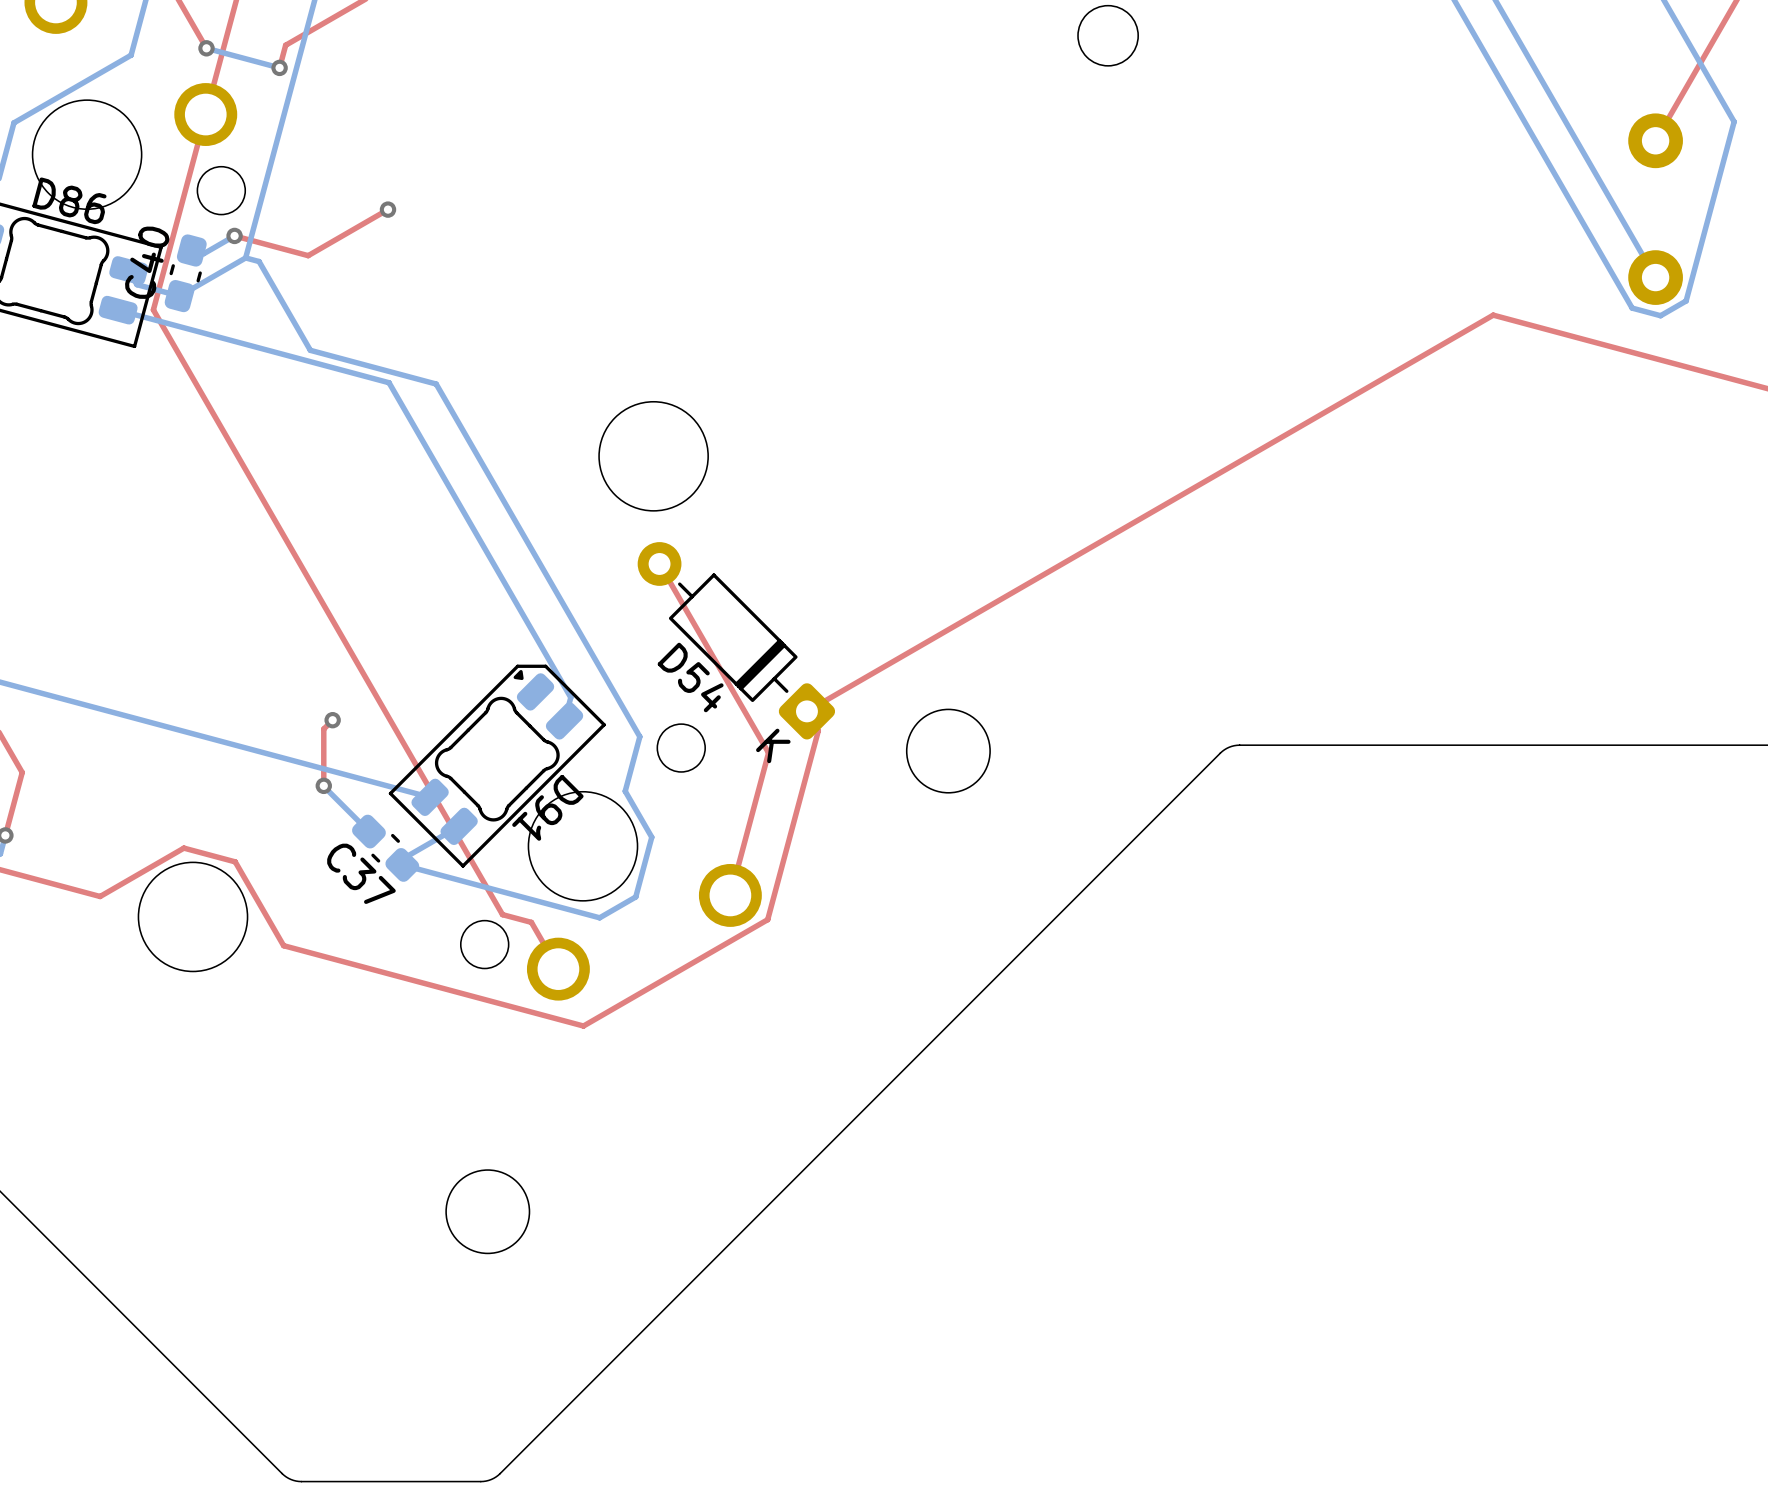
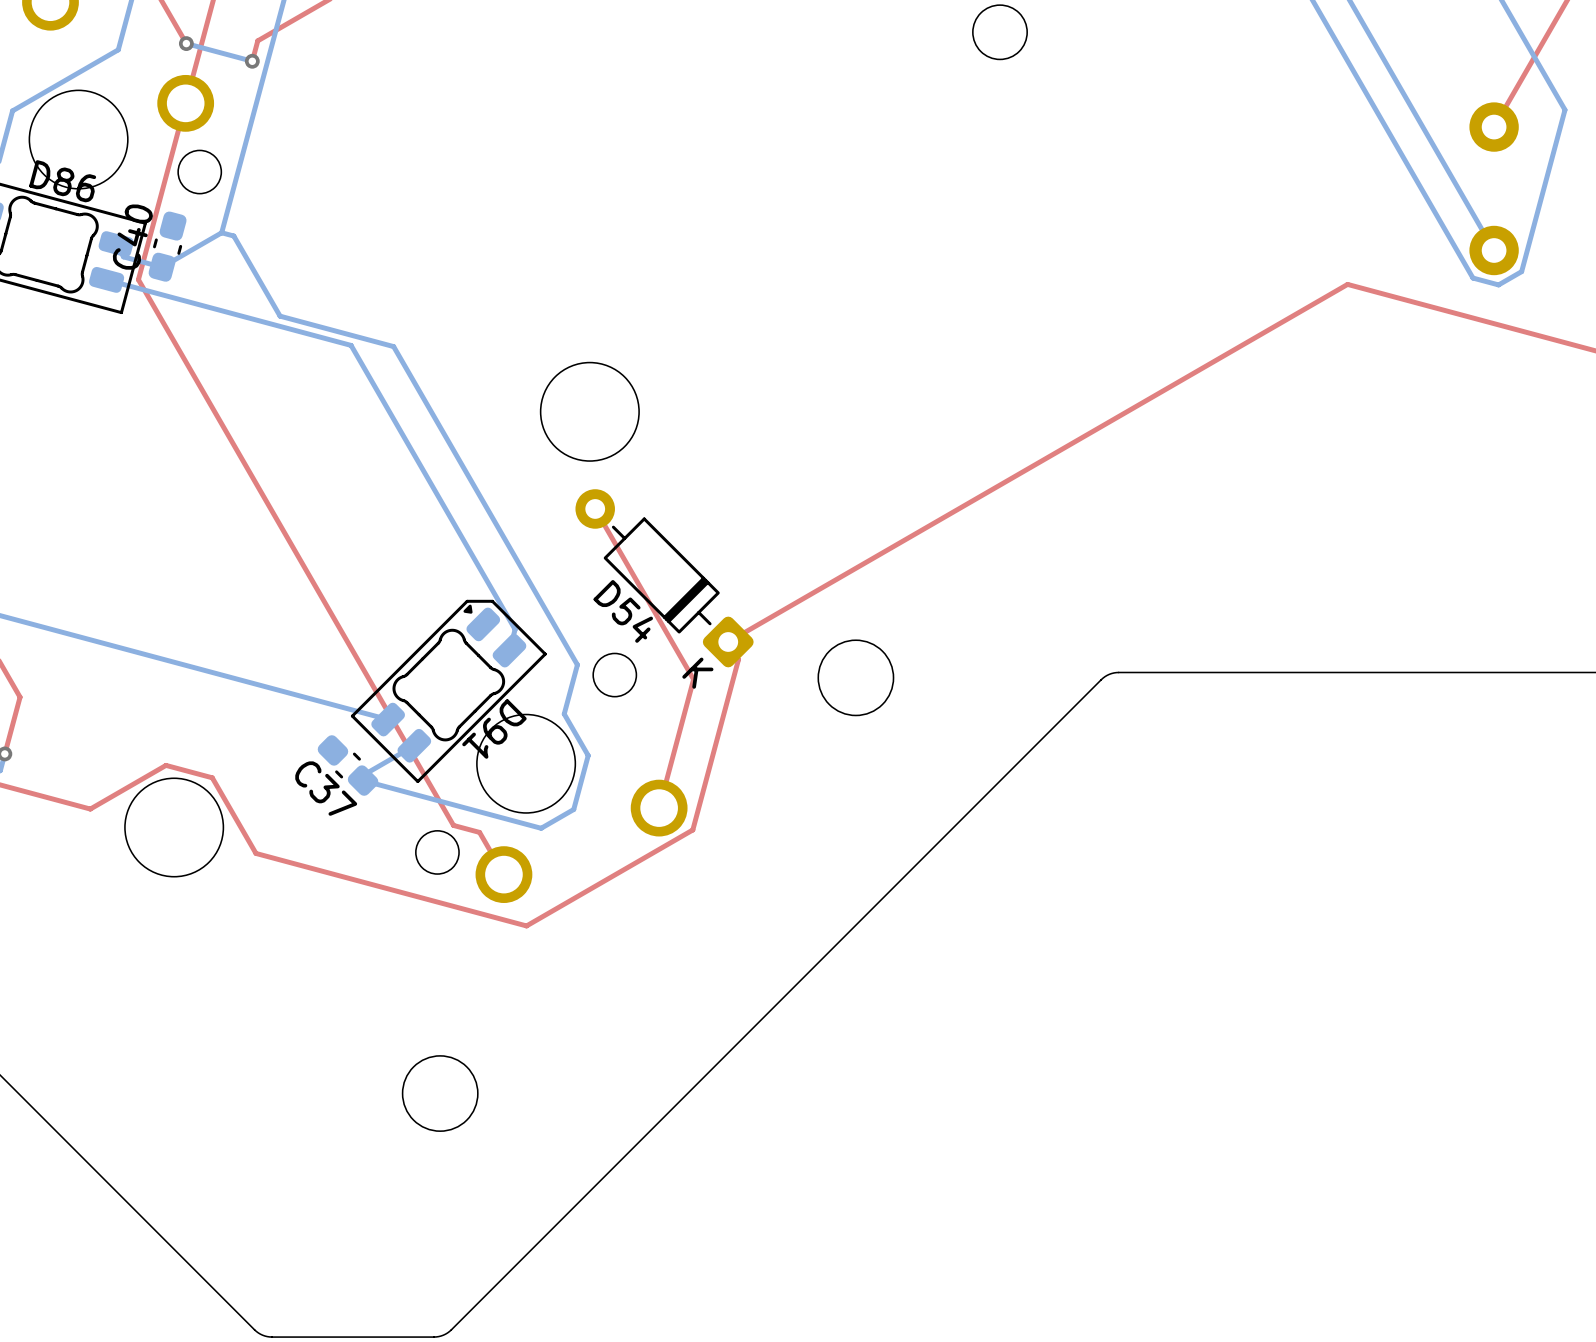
top track: (387, 209) (308, 255) (234, 235) -> none
via: (387, 209) -> none
bottom track: (234, 235) (203, 253) (191, 250) -> none
via: (234, 235) -> none
top track: (332, 720) (323, 729) (323, 785) -> none
via: (332, 720) -> none
via: (323, 785) -> none
bottom track: (323, 786) (368, 831) -> none

